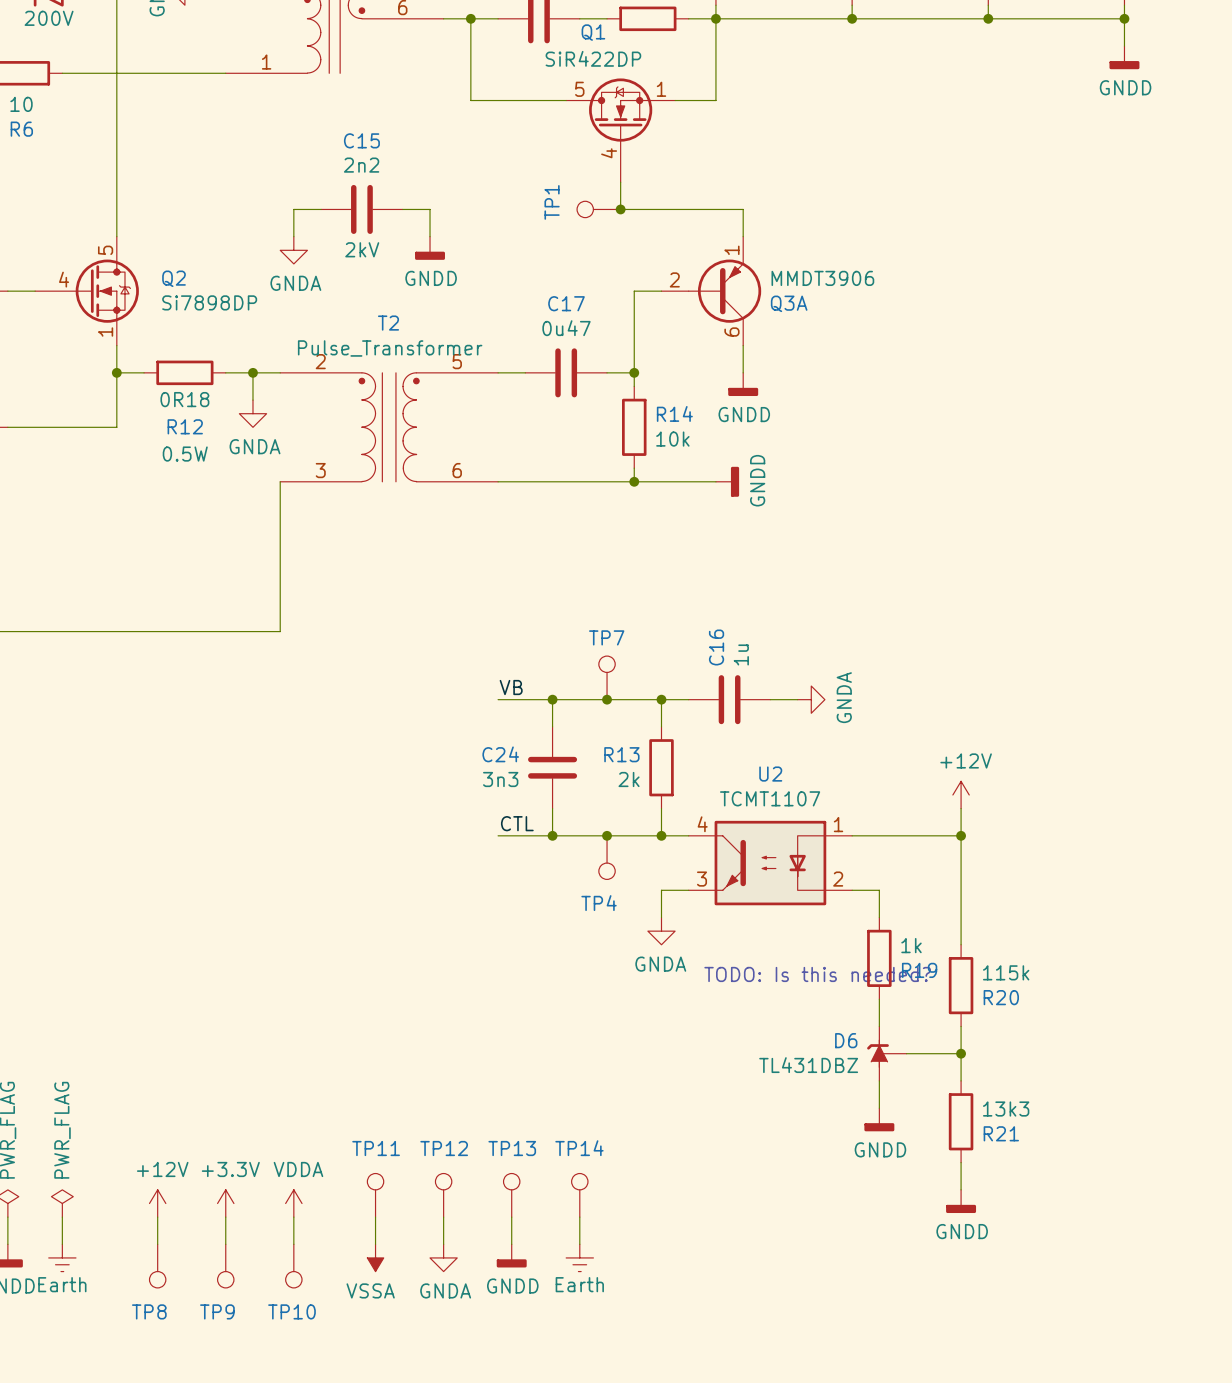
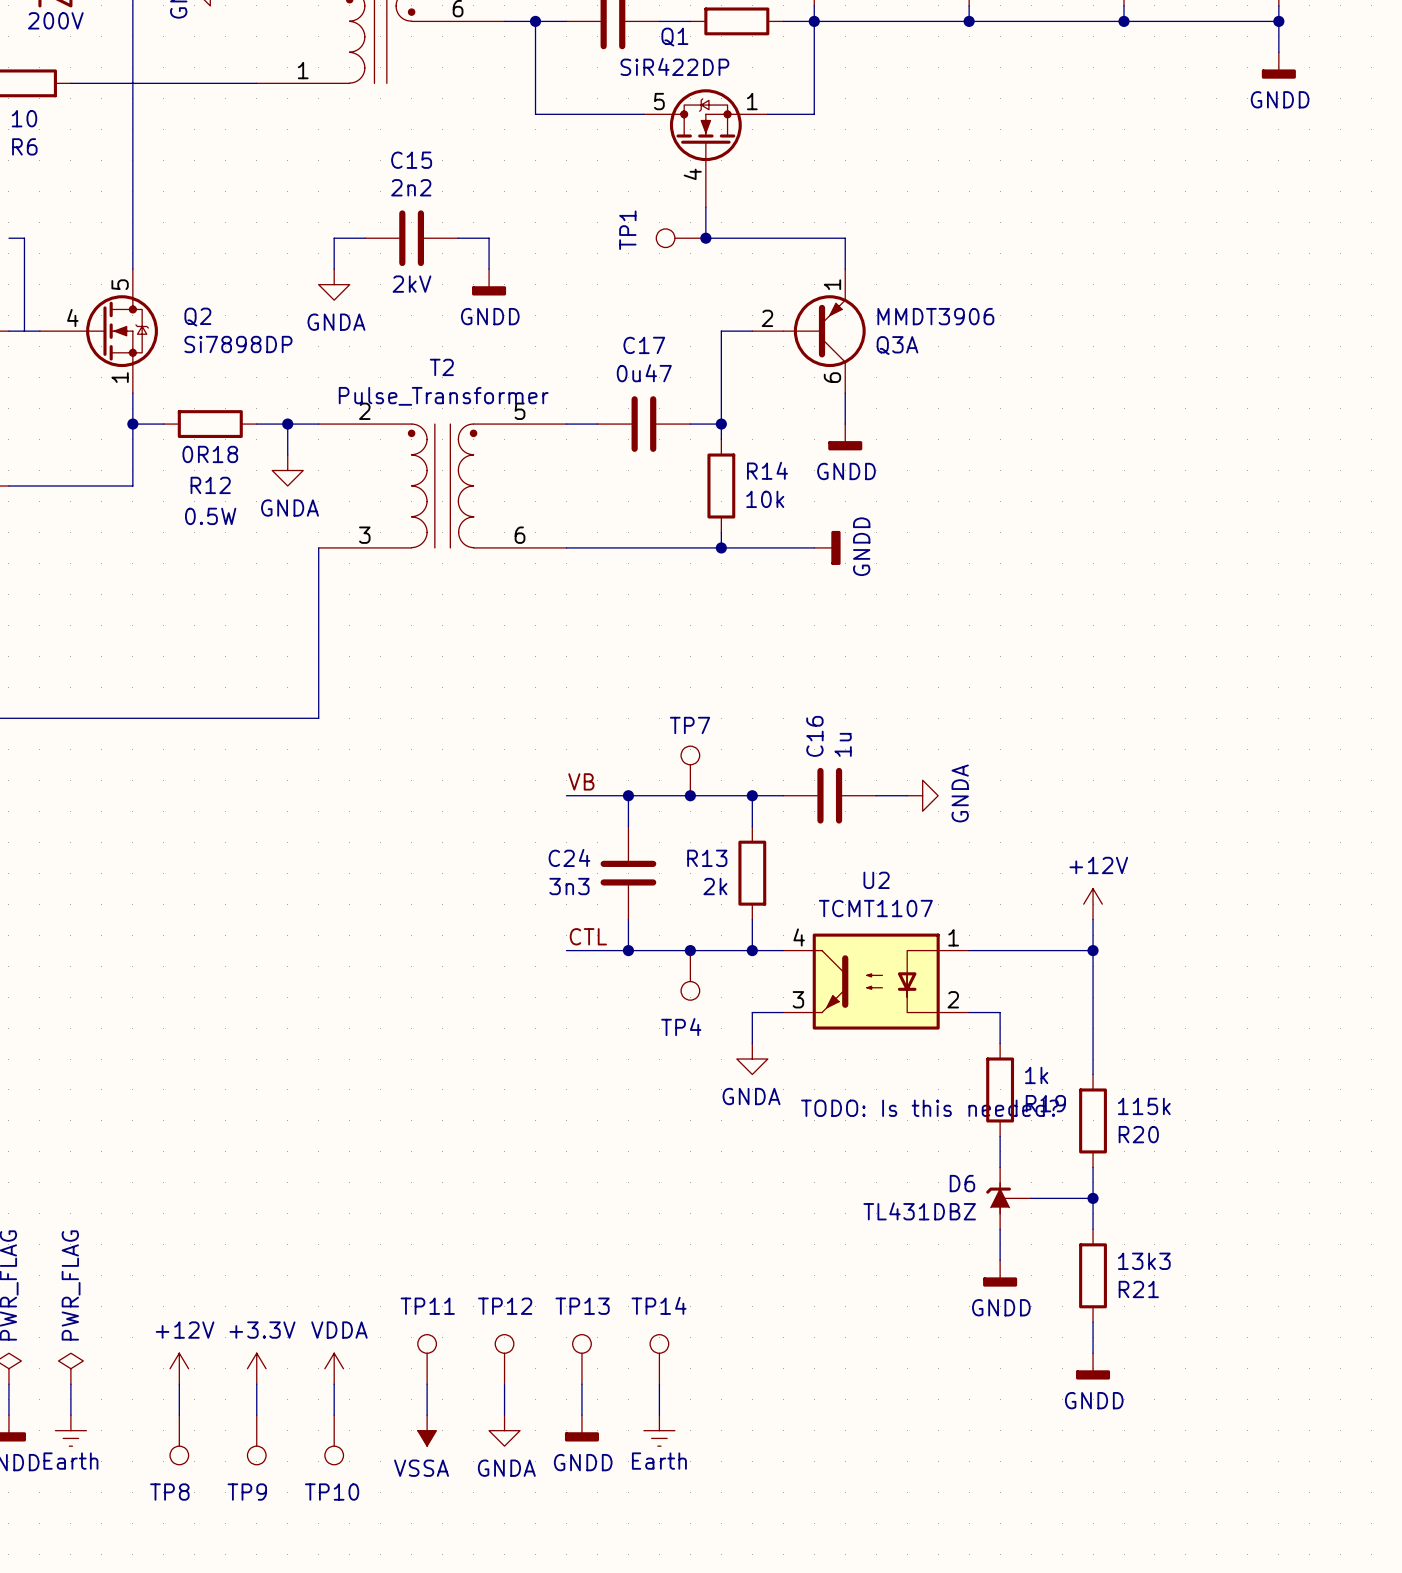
wire: none -> (8, 238) (24, 238) (24, 331)

